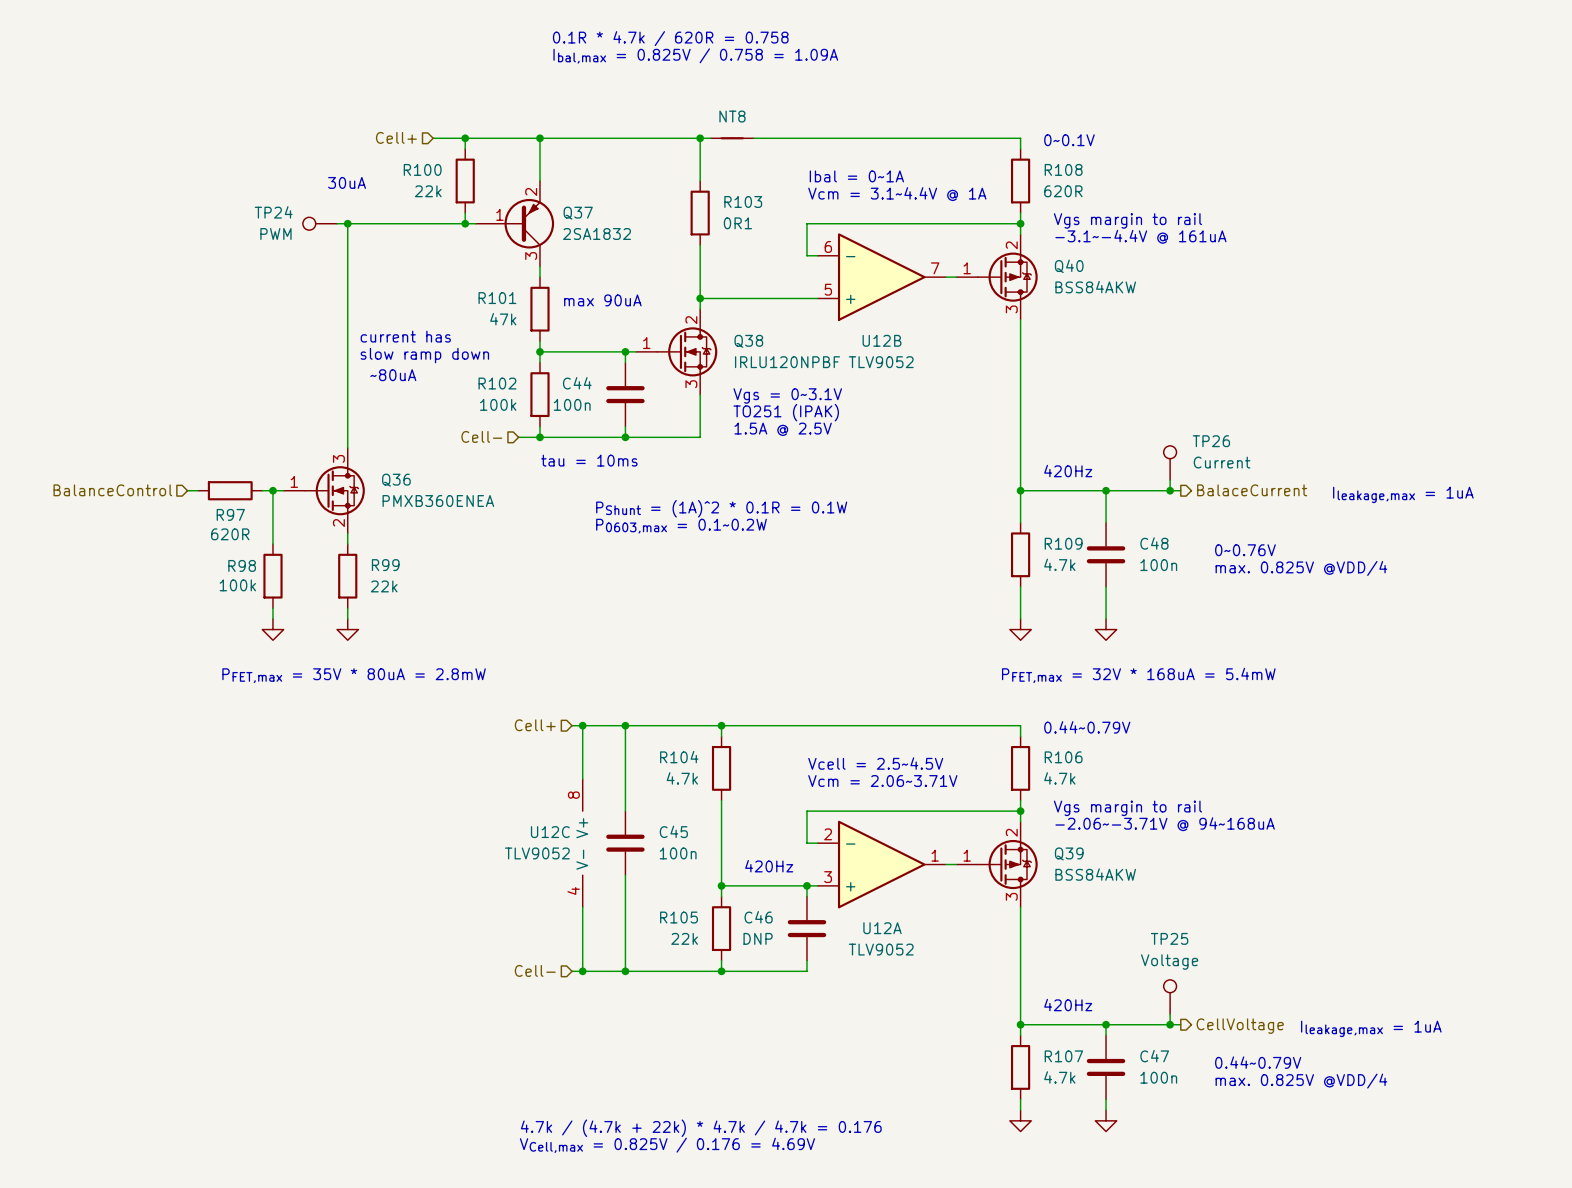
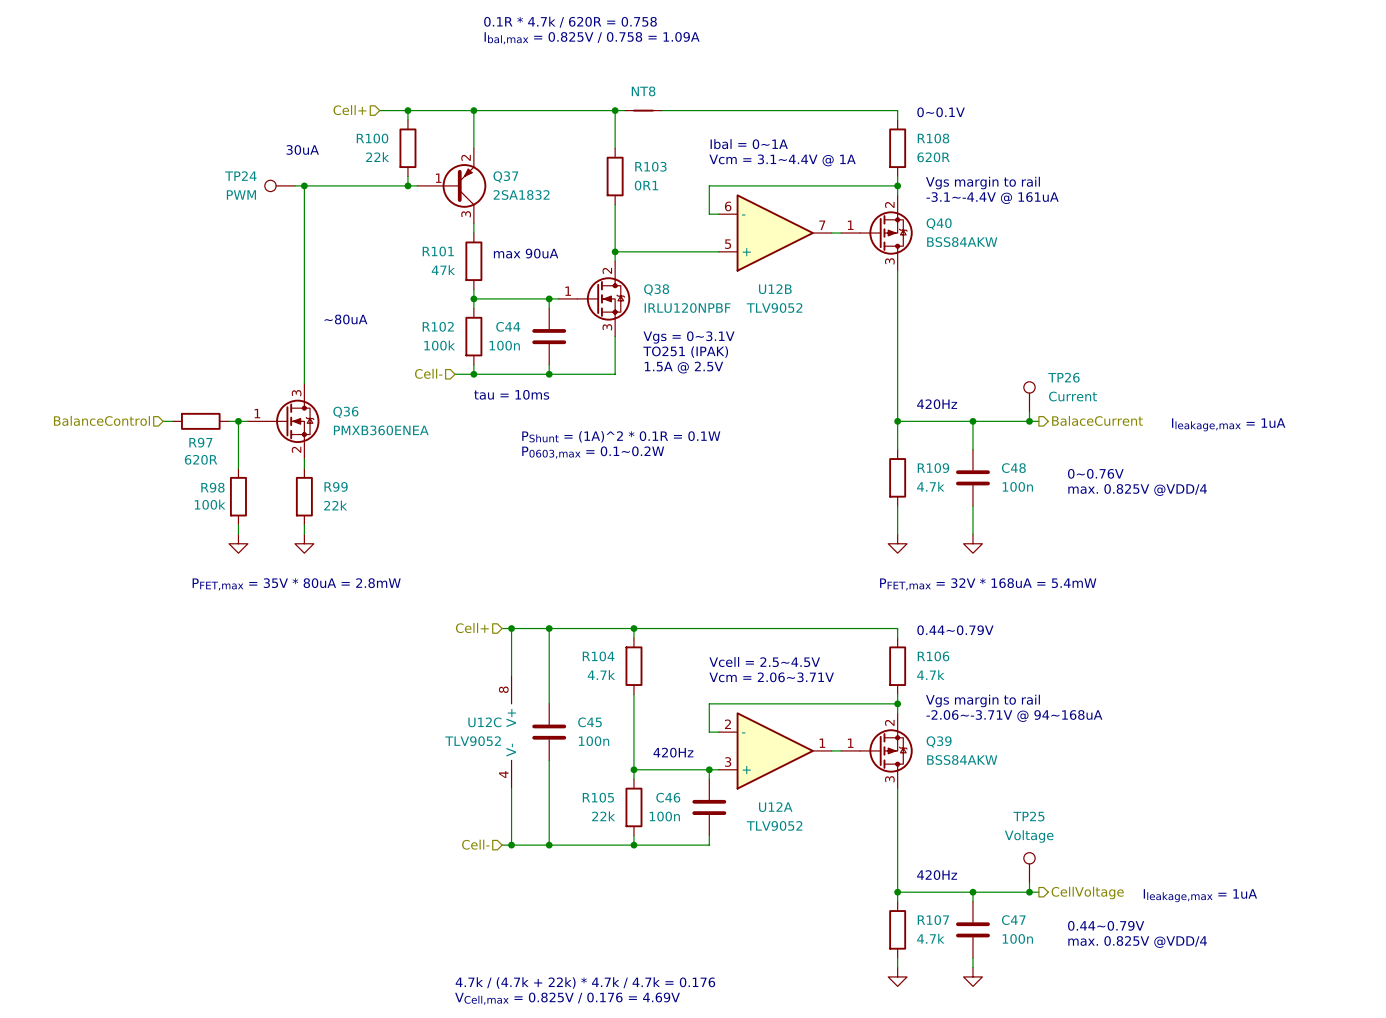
text: current has (405, 336) -> none
text: slow ramp down (424, 355) -> none
C46 value: DNP (758, 938) -> 100n (664, 816)

